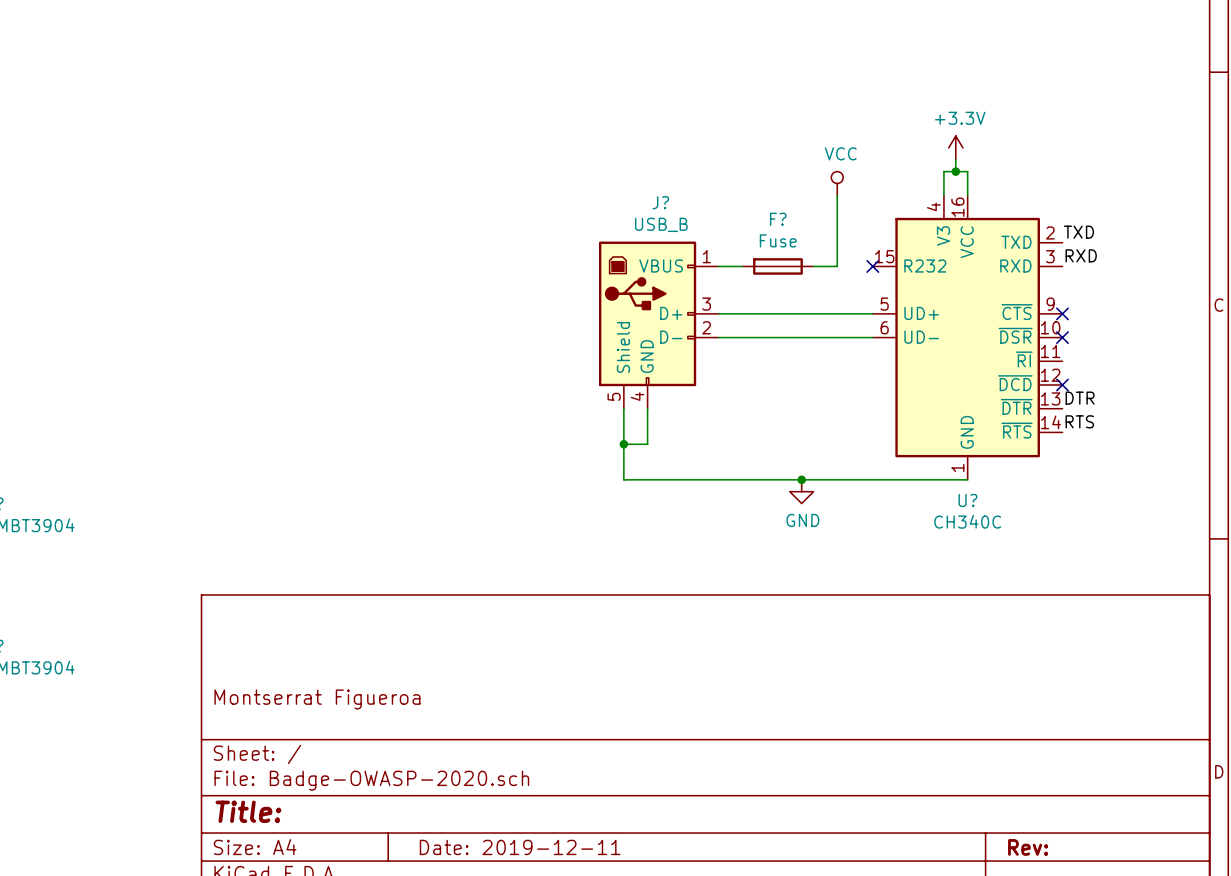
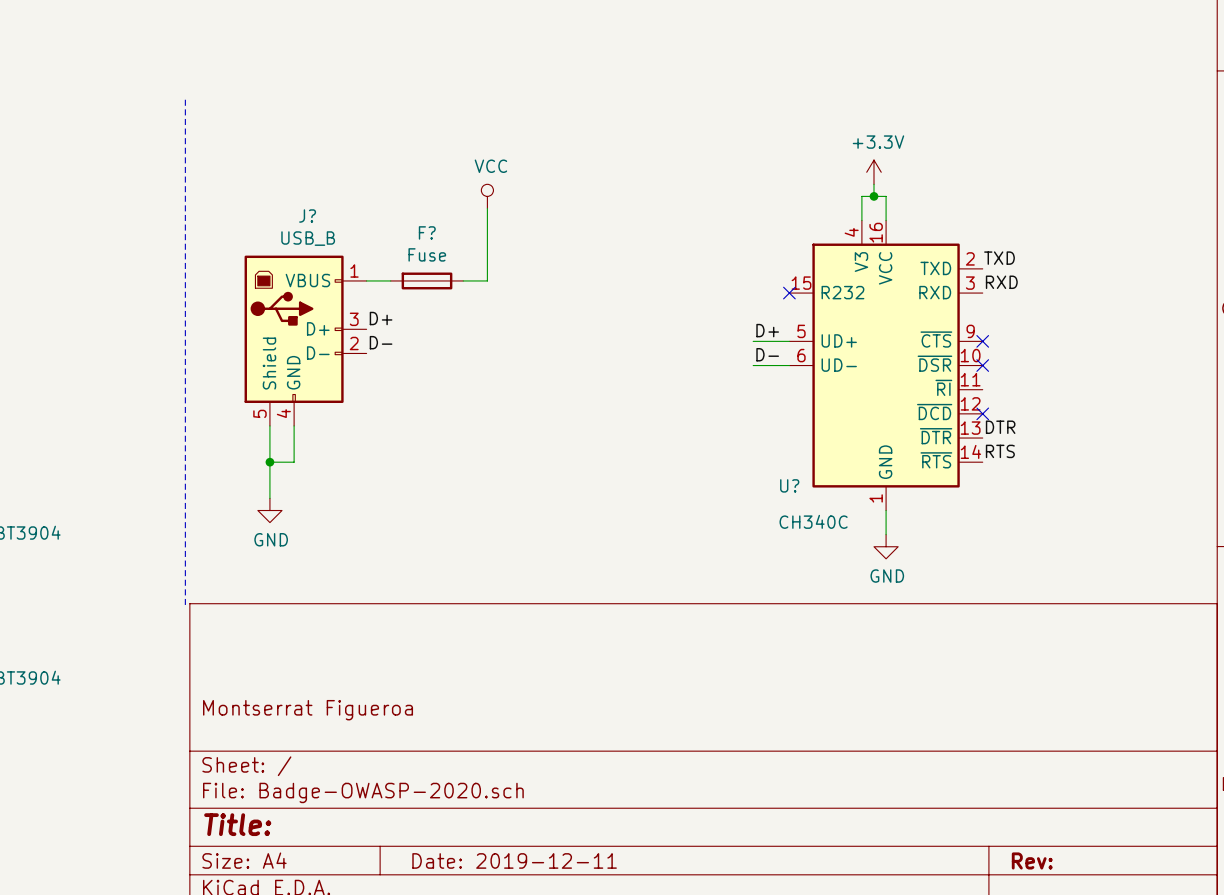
line: none -> (185, 99) (185, 607)
power symbol position: +3.3V (955, 147) -> +3.3V (873, 172)
wire: (955, 159) (955, 171) -> (873, 184) (873, 196)
junction: (955, 171) -> none
power symbol: VCC (837, 183) -> none
power symbol: none -> VCC (487, 196)
wire: (837, 195) (837, 266) (813, 266) -> none
junction: none -> (873, 196)
wire: (943, 195) (943, 171) (967, 171) (967, 195) -> (861, 220) (861, 196) (886, 196) (886, 220)
wire: none -> (487, 208) (487, 280) (463, 280)
label position: TXD (1078, 232) -> TXD (999, 258)
label position: RXD (1081, 255) -> RXD (1001, 282)
wire: (718, 266) (742, 266) -> none
F?: Fuse (777, 266) -> none
no-connect mark: (872, 266) -> none
wire: none -> (366, 280) (390, 280)
F?: none -> Fuse (426, 280)
no-connect mark: none -> (789, 293)
wire: (718, 313) (872, 313) -> none
no-connect mark: (1062, 313) -> none
label: none -> D+ (381, 318)
J?: USB_B (658, 325) -> none
label: none -> D+ (767, 330)
J?: none -> USB_B (305, 340)
wire: (718, 337) (754, 337) -> (753, 365) (789, 365)
U? position: (967, 337) -> (886, 365)
no-connect mark: none -> (982, 341)
no-connect mark: (1062, 337) -> none
label: none -> D- (381, 342)
label: none -> D- (767, 354)
no-connect mark: none -> (982, 365)
no-connect mark: (1062, 385) -> none
label position: DTR (1080, 398) -> DTR (1000, 427)
wire: (623, 408) (623, 479) (967, 479) -> none
wire: (647, 408) (647, 444) (623, 444) -> none
no-connect mark: none -> (982, 413)
wire: none -> (269, 425) (269, 498)
wire: none -> (294, 425) (294, 462) (269, 462)
label position: RTS (1079, 421) -> RTS (1000, 451)
junction: (623, 444) -> none
junction: none -> (269, 462)
junction: (801, 479) -> none
power symbol position: GND (801, 491) -> GND (886, 546)
U? name position: U? (967, 500) -> U? (789, 485)
power symbol: none -> GND (269, 510)
wire: none -> (886, 510) (886, 534)
U? value position: CH340C (967, 521) -> CH340C (813, 521)

